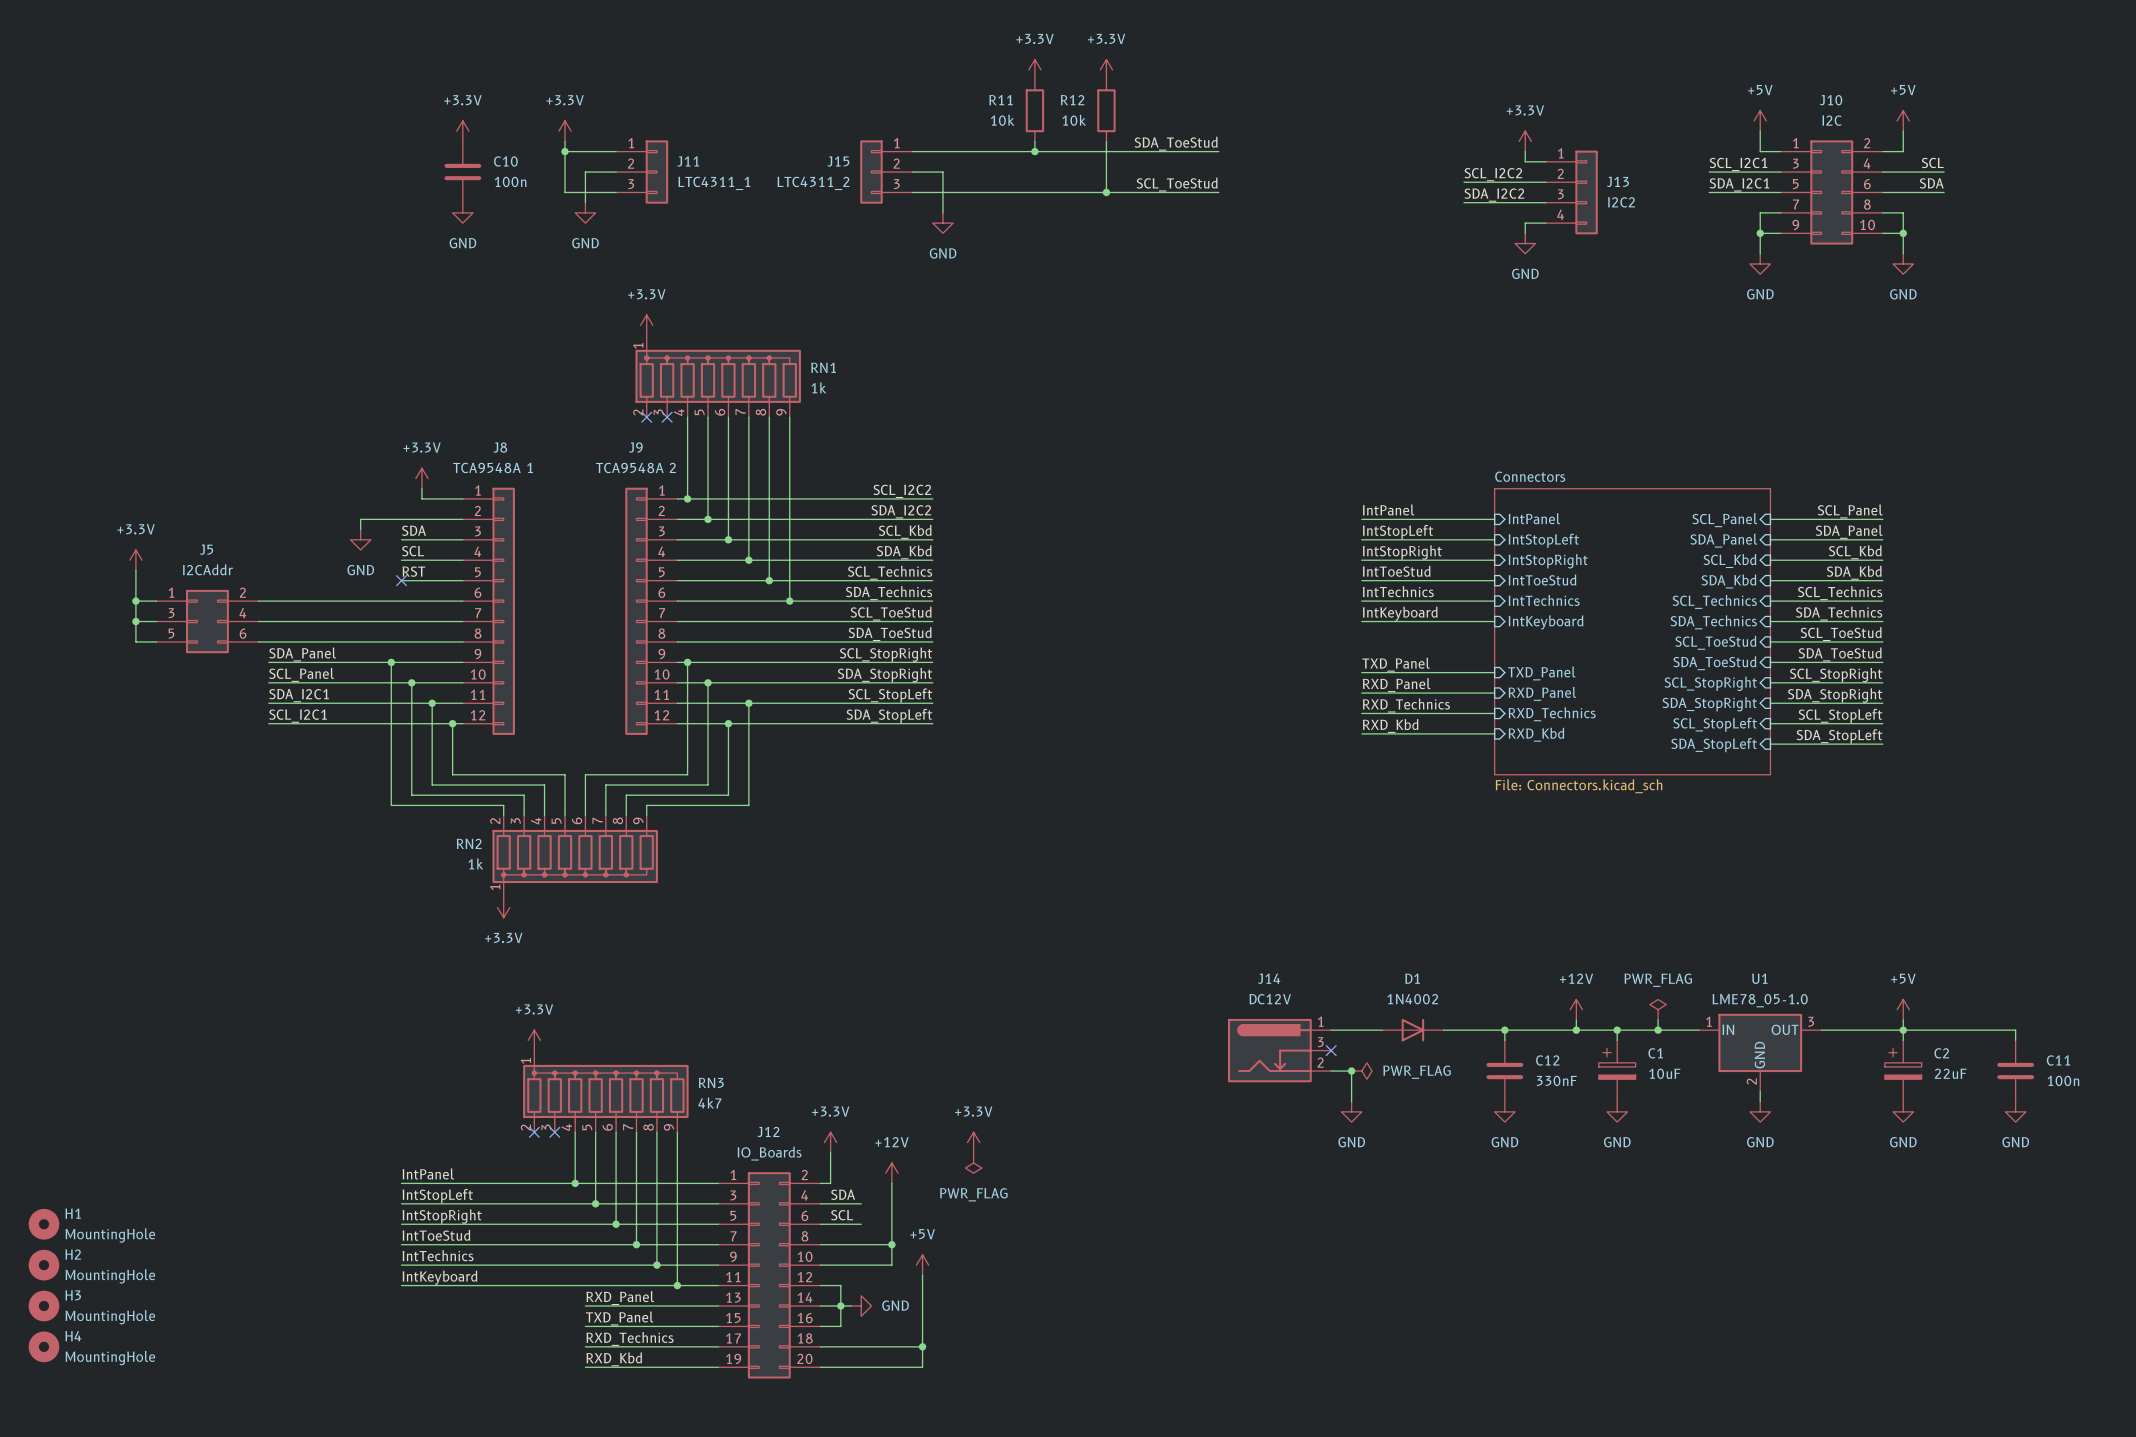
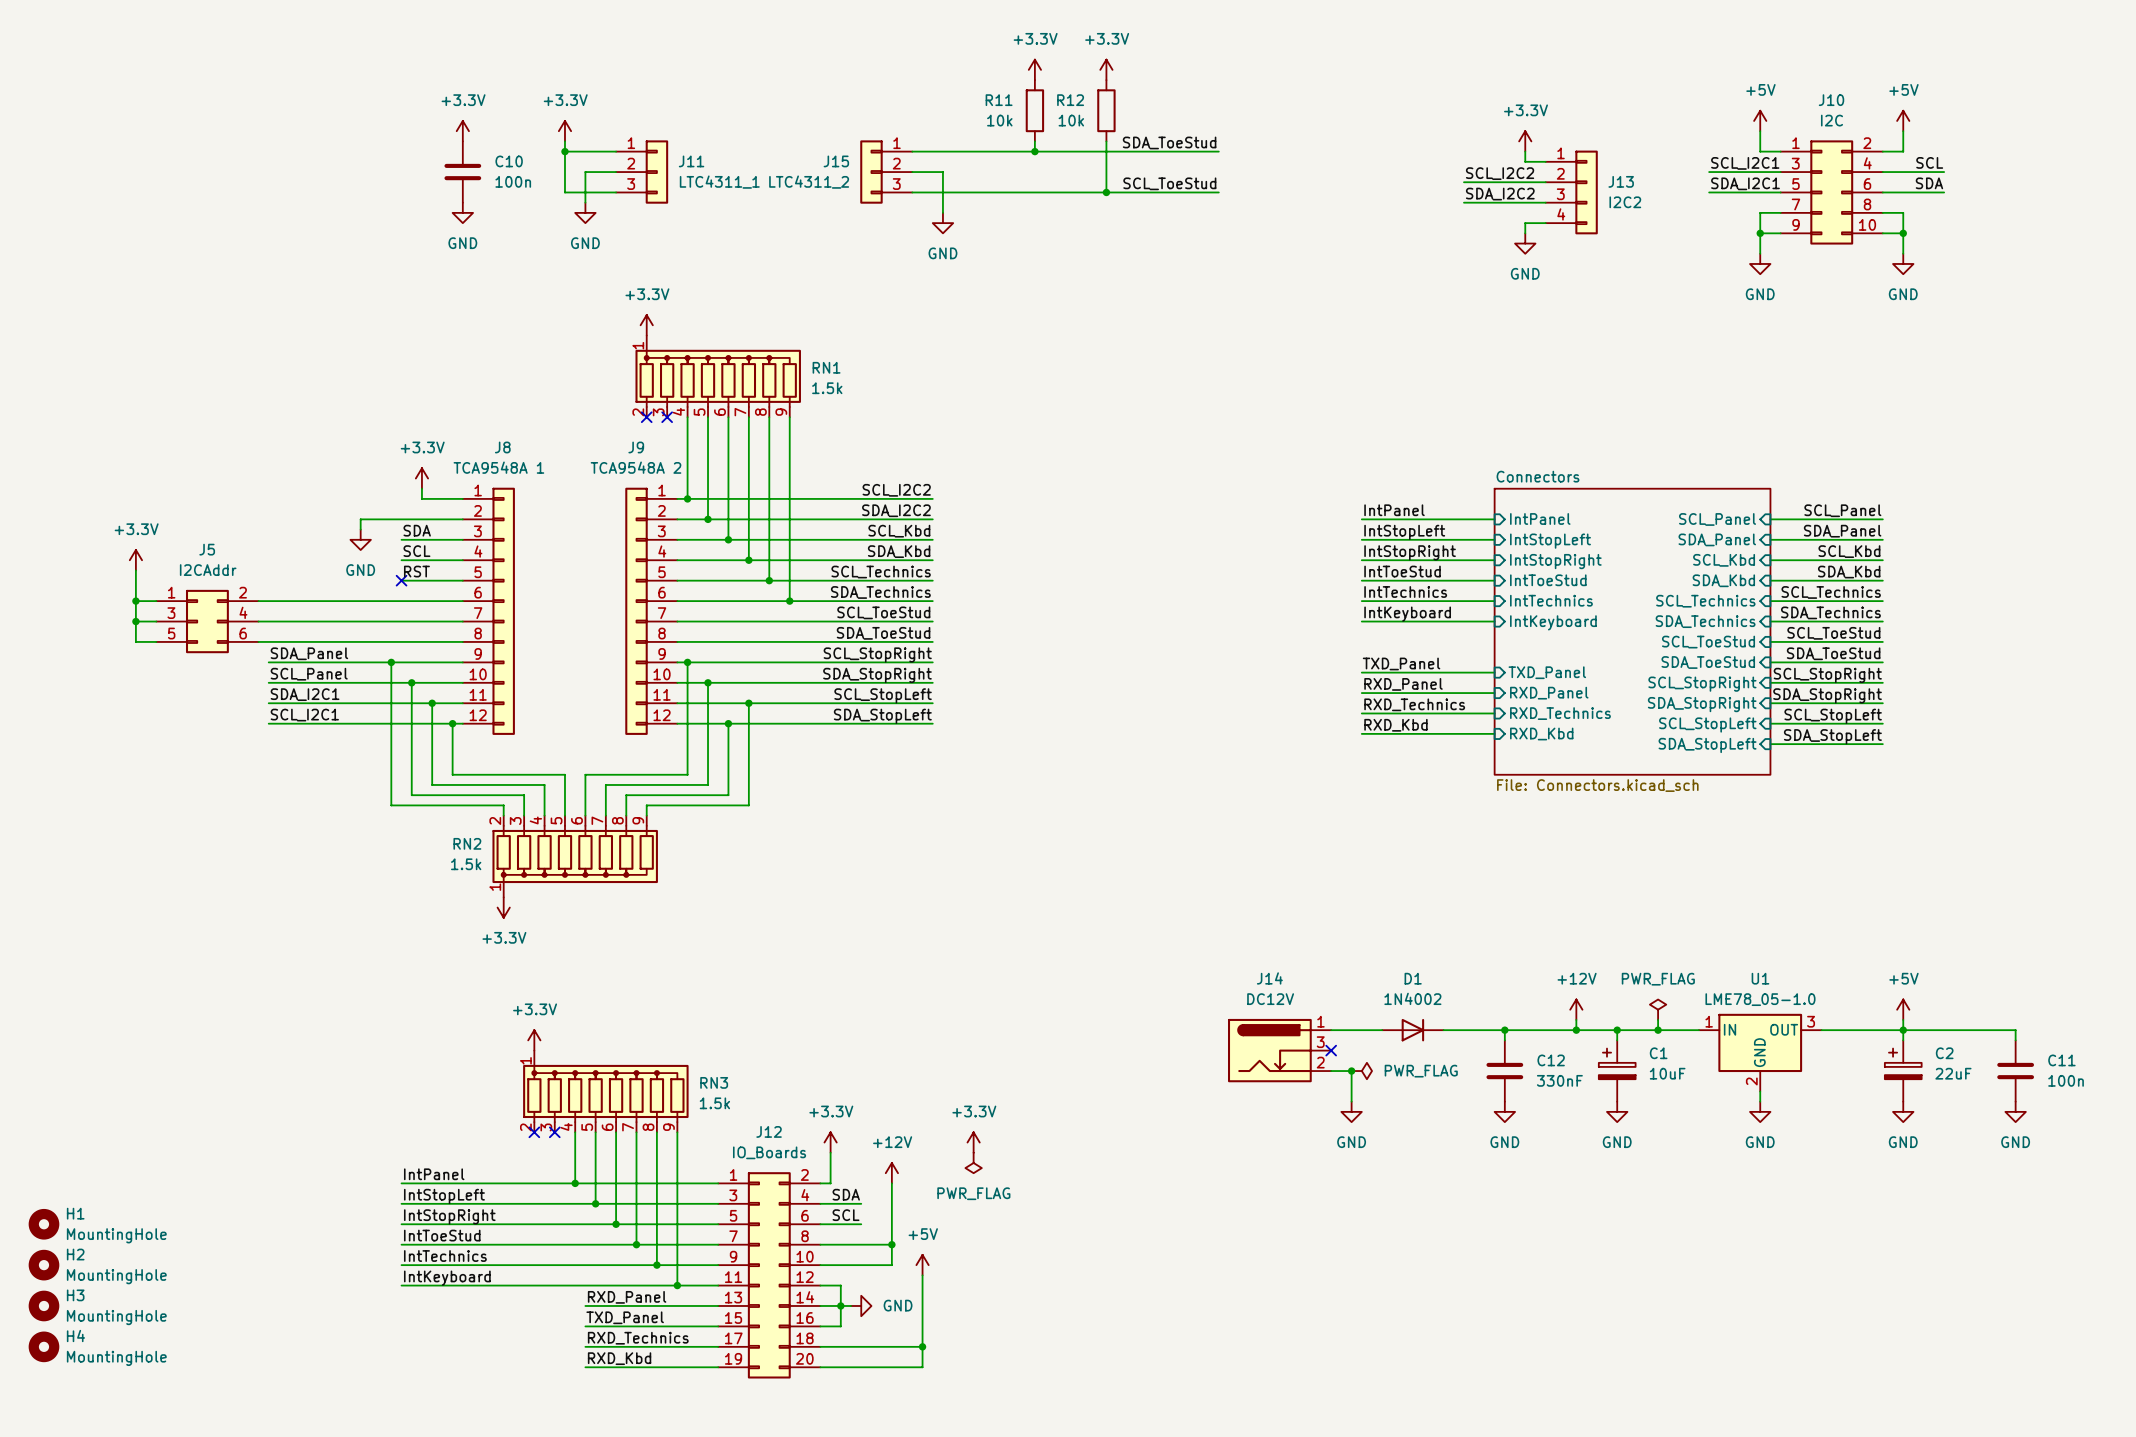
RN1 value: 1k (818, 387) -> 1.5k (827, 388)
RN2 value: 1k (475, 863) -> 1.5k (466, 864)
RN3 value: 4k7 (709, 1103) -> 1.5k (714, 1103)

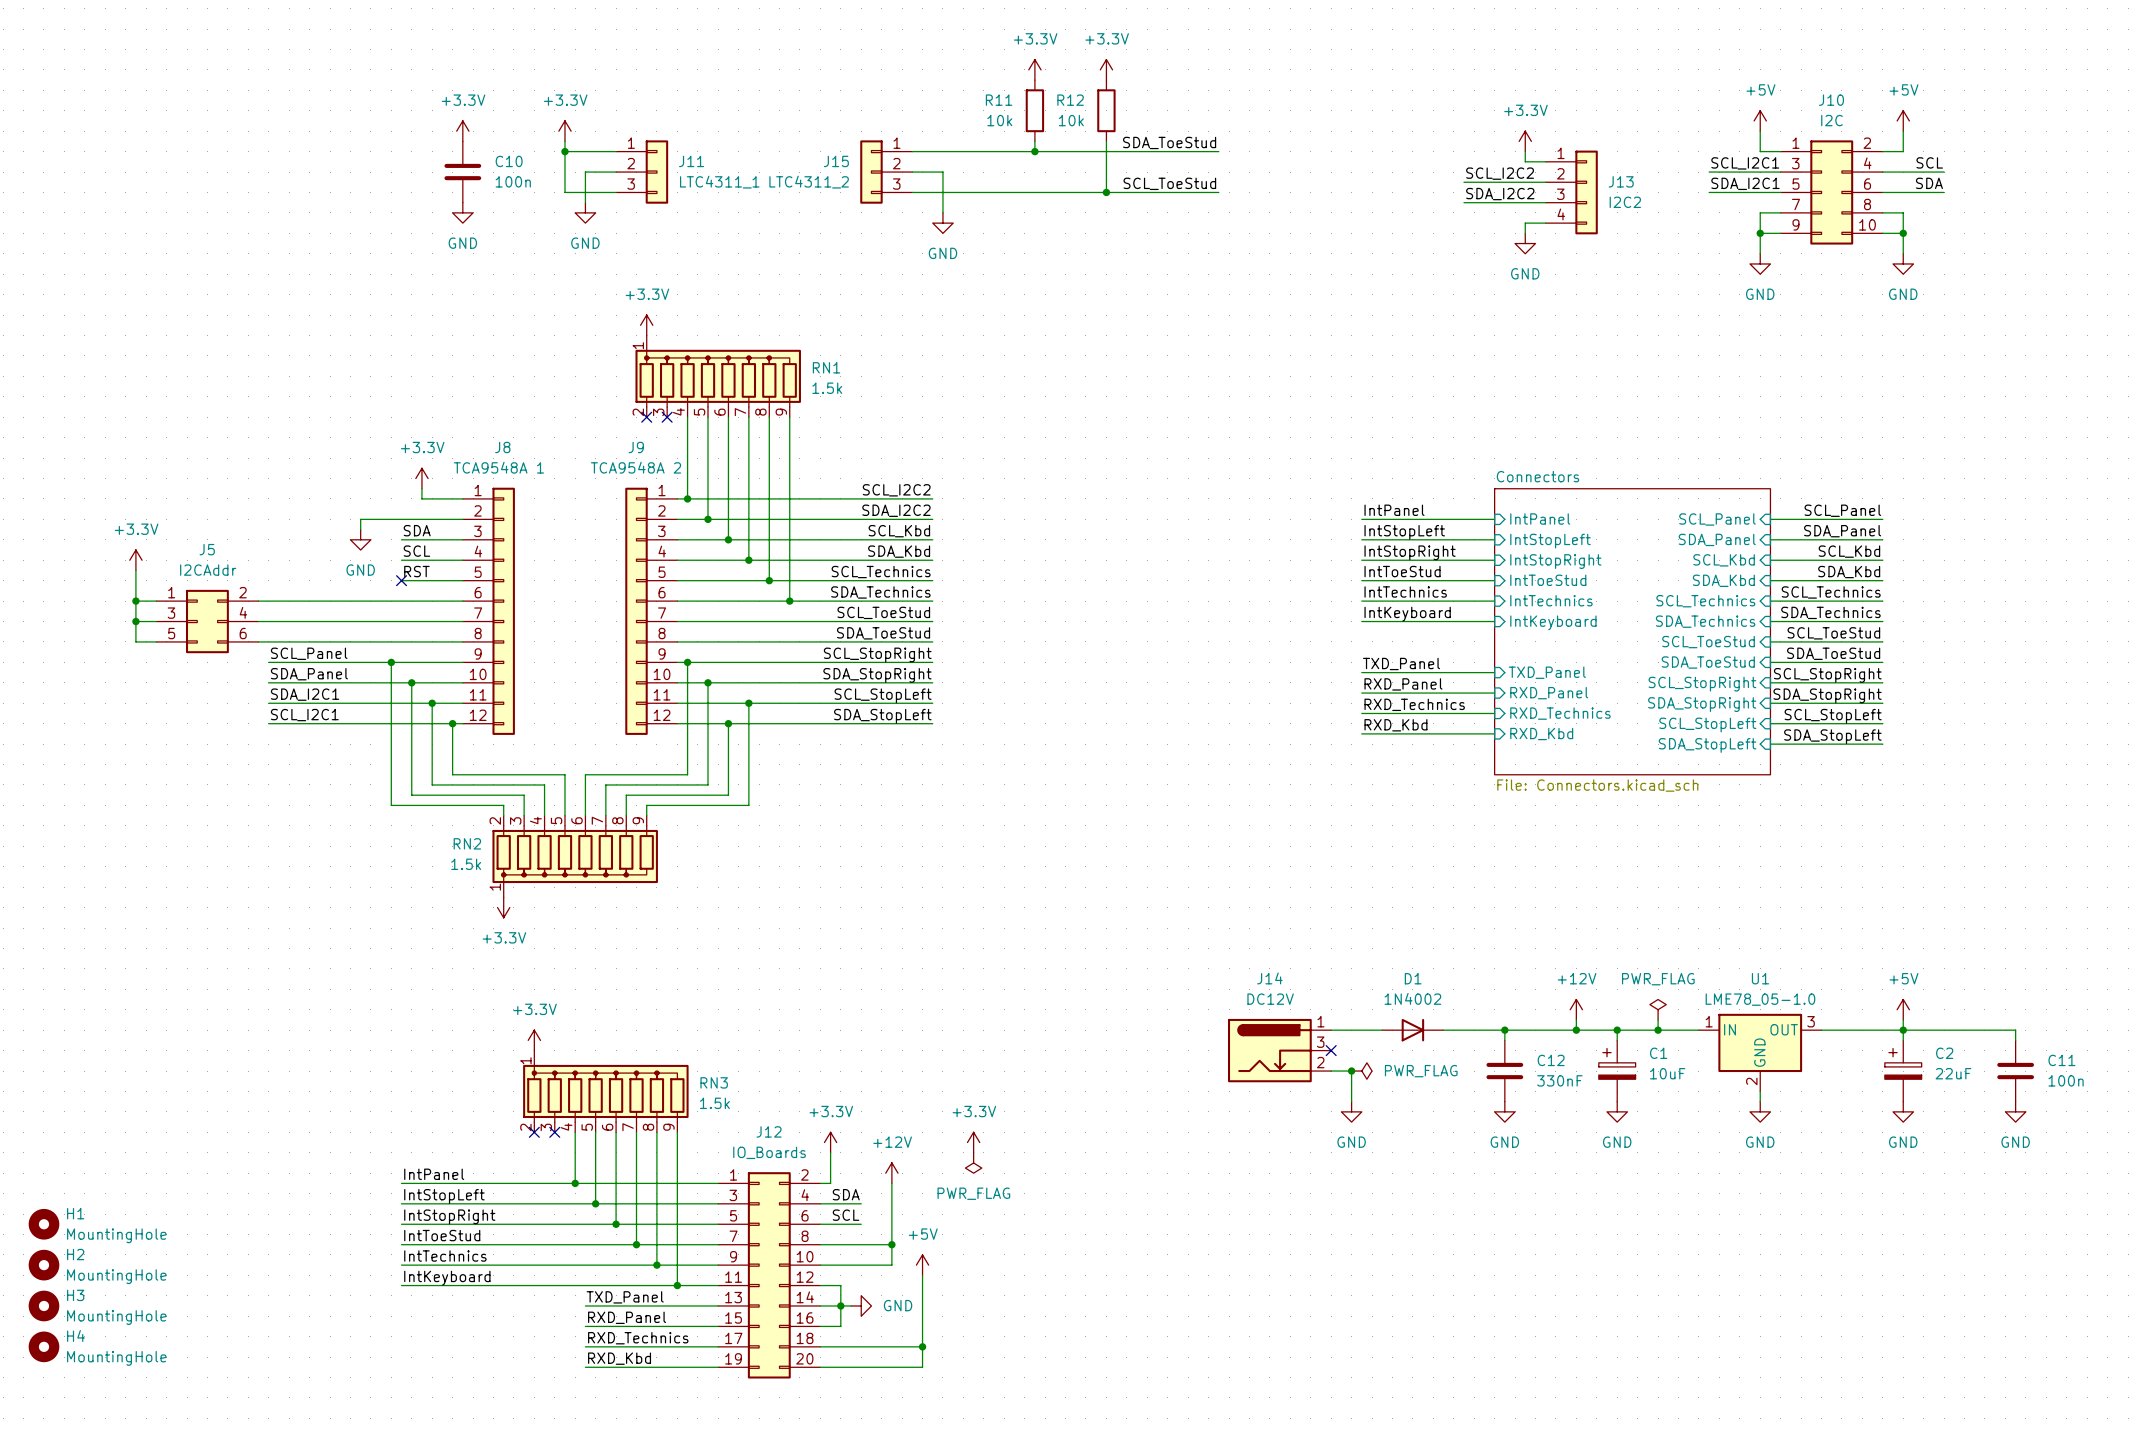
label: SDA_Panel (309, 653) -> SCL_Panel (309, 653)
label: SCL_Panel (309, 674) -> SDA_Panel (309, 674)
label: RXD_Panel (627, 1297) -> TXD_Panel (625, 1297)
label: TXD_Panel (625, 1317) -> RXD_Panel (627, 1317)

